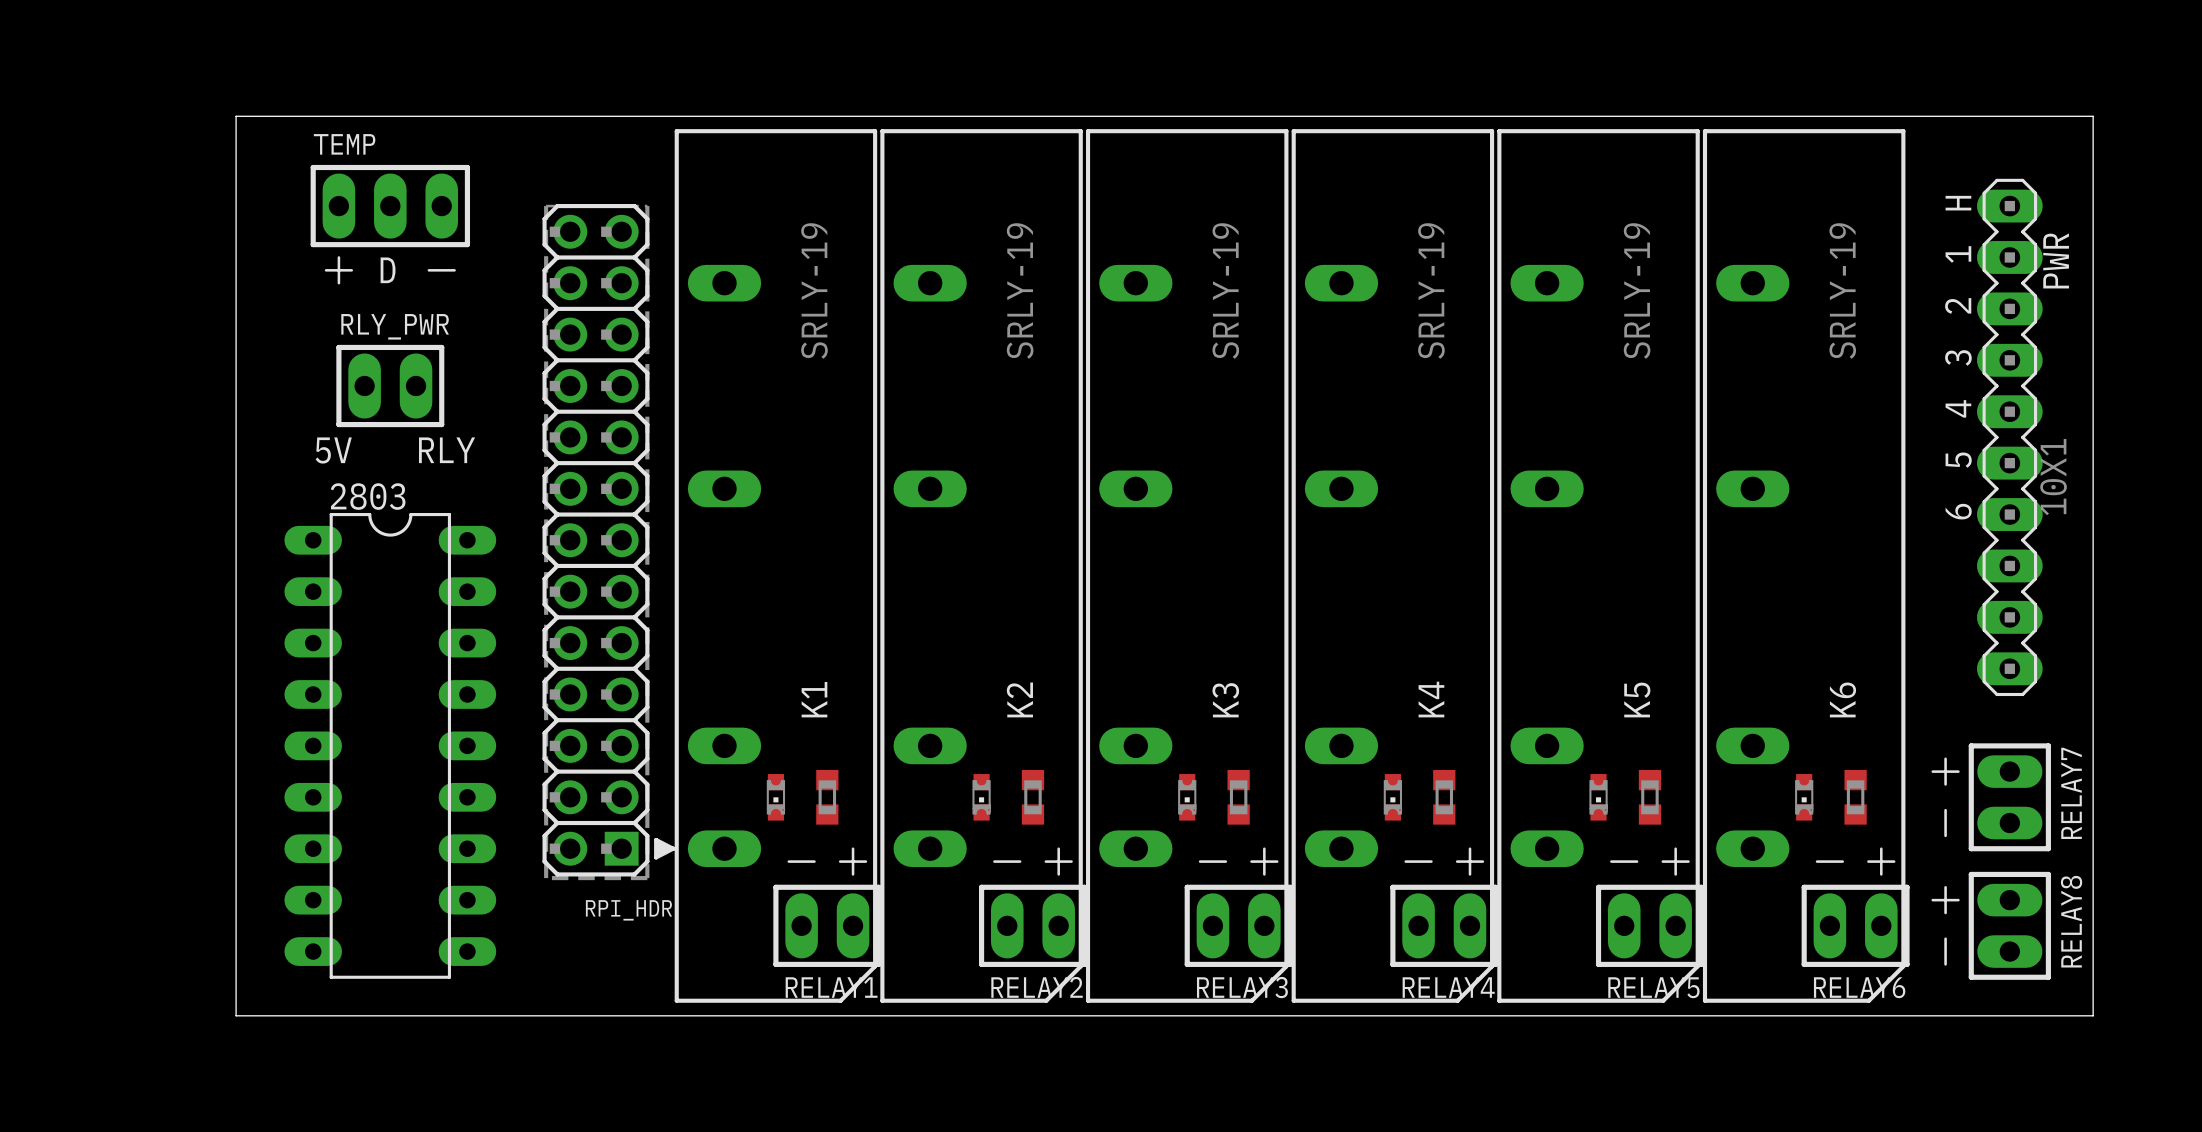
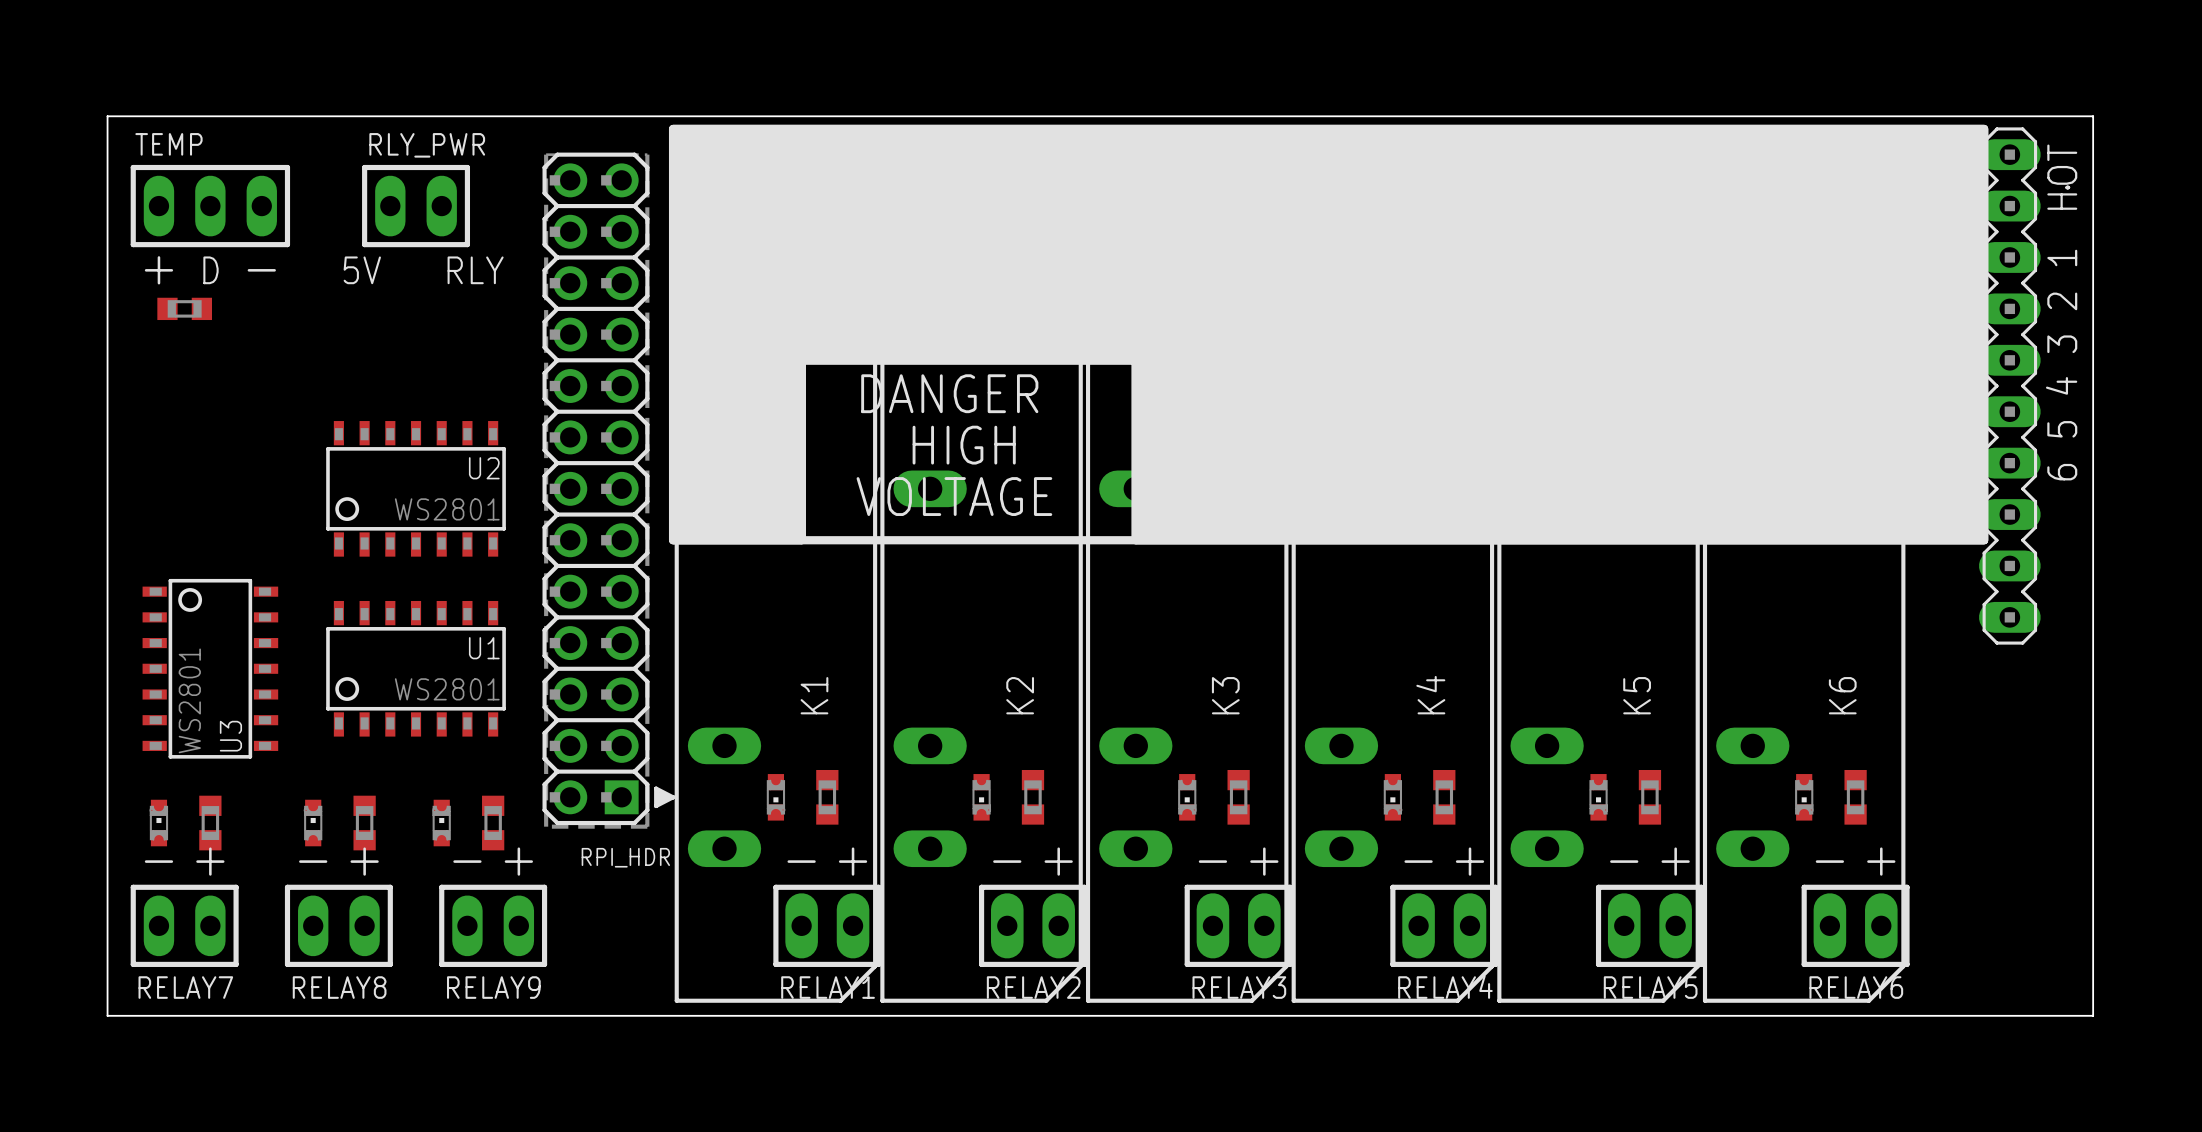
board edge: (236, 116) (236, 1015) -> (236, 116) (107, 116) (107, 1015) (236, 1015)
drawing: none -> [668, 124, 1989, 545]
text: none -> HOT (2062, 177)
RLY_PWR: none -> (416, 206)
TEMP: none -> (210, 224)
TEMP: (390, 224) -> none
part: none -> (184, 308)
text: none -> 6 5 4 3 2 1 (2061, 365)
RLY_PWR: (390, 386) -> none
part: none -> (2009, 386)
text: none -> DANGER (949, 393)
PWR: 10X1 (2009, 437) -> none
text: none -> HIGH (964, 445)
U2: none -> WS2801 (416, 488)
text: none -> VOLTAGE (954, 496)
line: none -> (801, 540) (1135, 540)
RPI_HDR position: (608, 542) -> (608, 490)
U3: none -> WS2801 (210, 668)
U1: none -> WS2801 (416, 668)
RELAY7 footprint: [1931, 743, 2051, 852] -> [130, 847, 239, 967]
2803: (390, 745) -> none
RELAY7 name position: RELAY7 (2071, 793) -> RELAY7 (185, 987)
part: none -> (158, 823)
part: none -> (210, 823)
part: none -> (313, 823)
part: none -> (364, 823)
part: none -> (441, 823)
part: none -> (493, 823)
RELAY8 footprint: [1931, 871, 2051, 980] -> [284, 847, 393, 967]
RELAY9: none -> (493, 907)
RELAY8 name position: RELAY8 (2071, 921) -> RELAY8 (339, 987)

